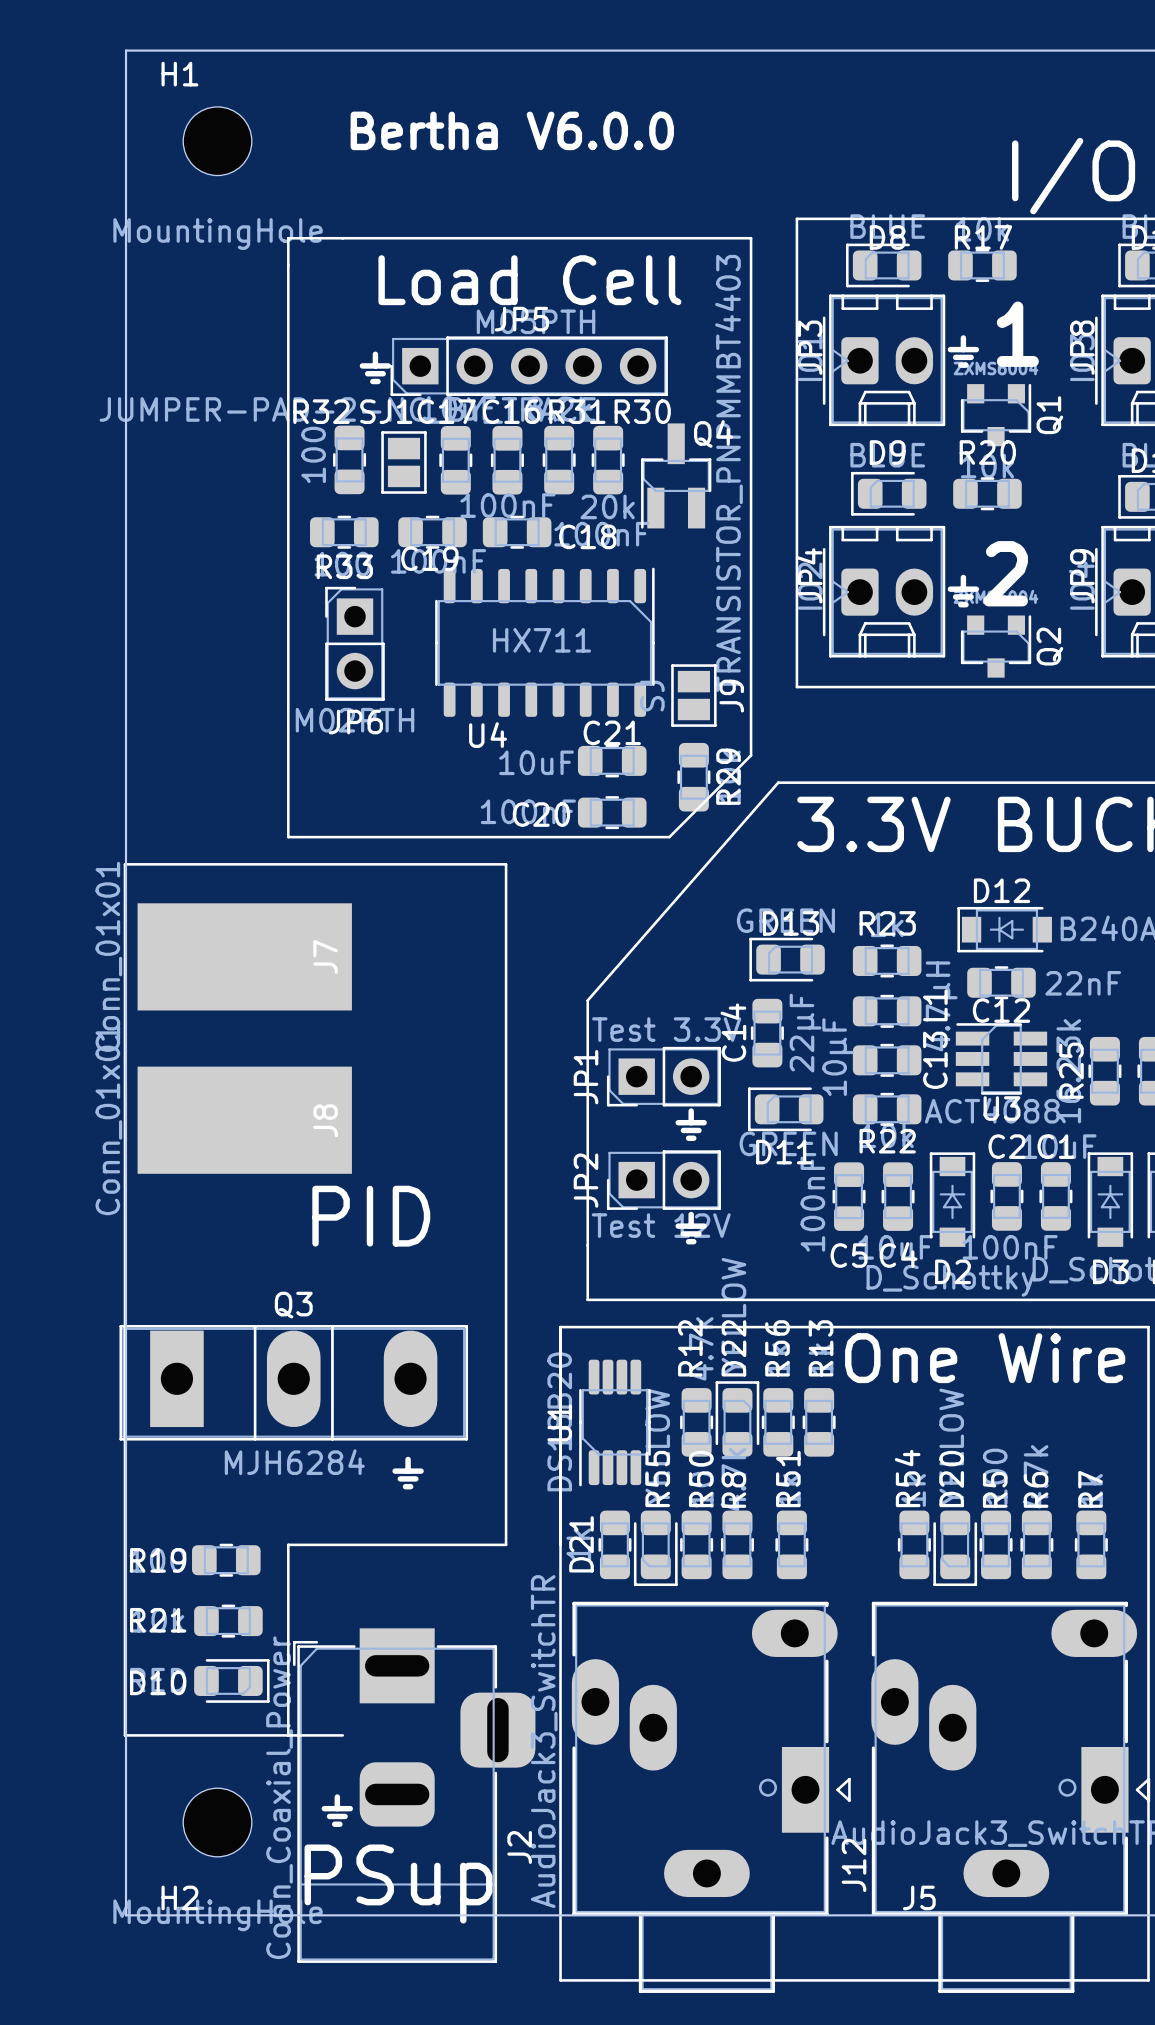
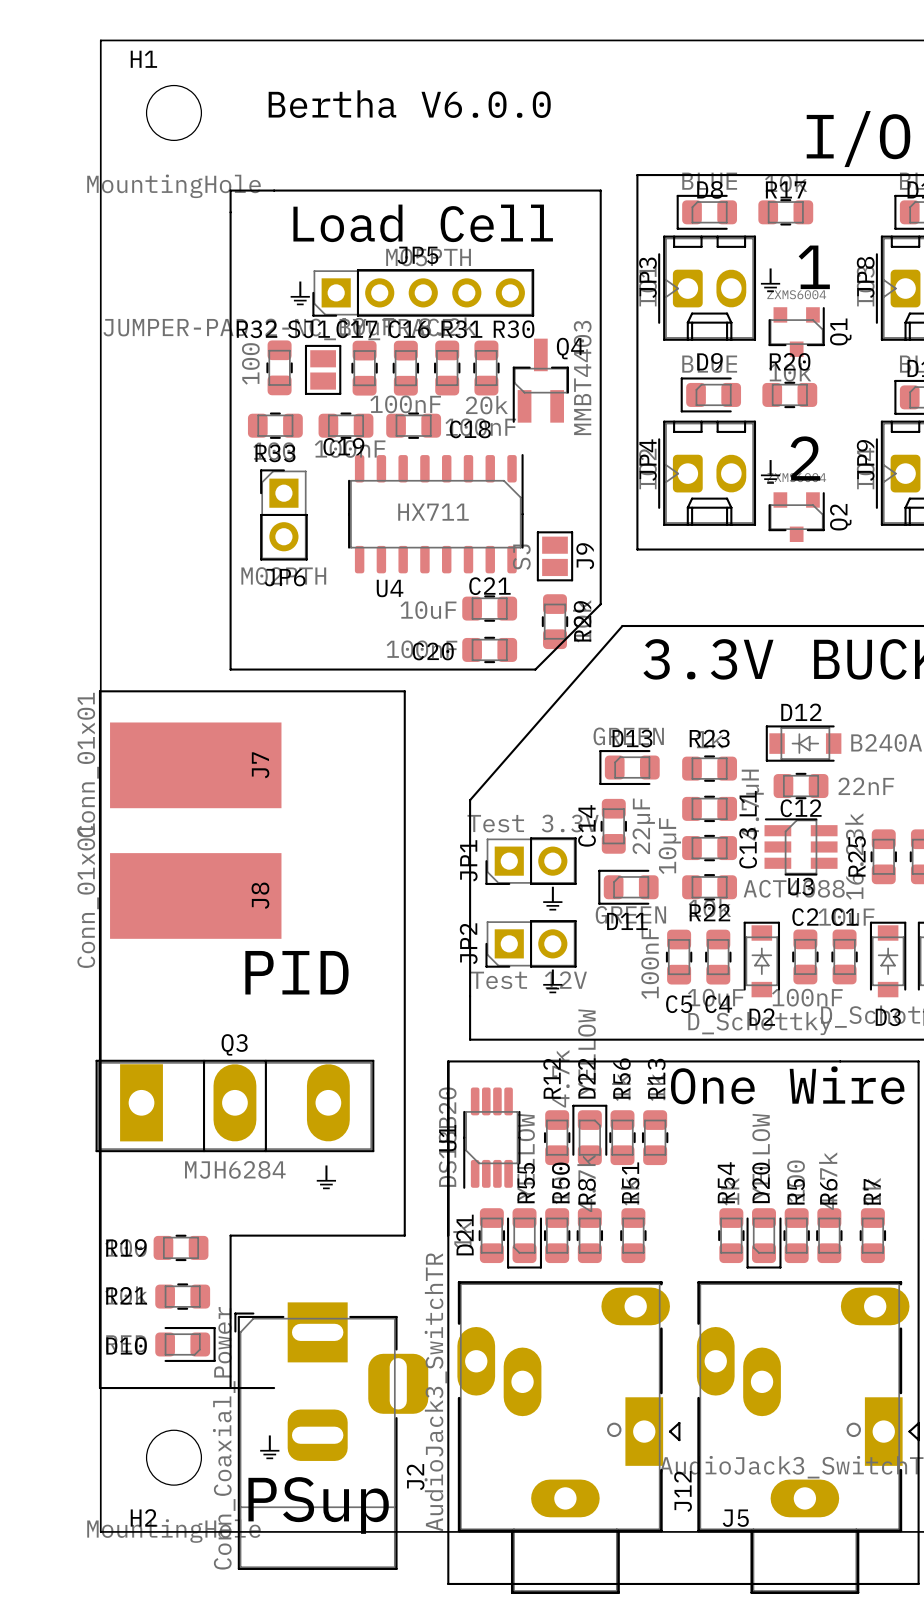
Q4 value: TRANSISTOR_PNPMMBT4403 (728, 473) -> MMBT4403 (582, 377)

